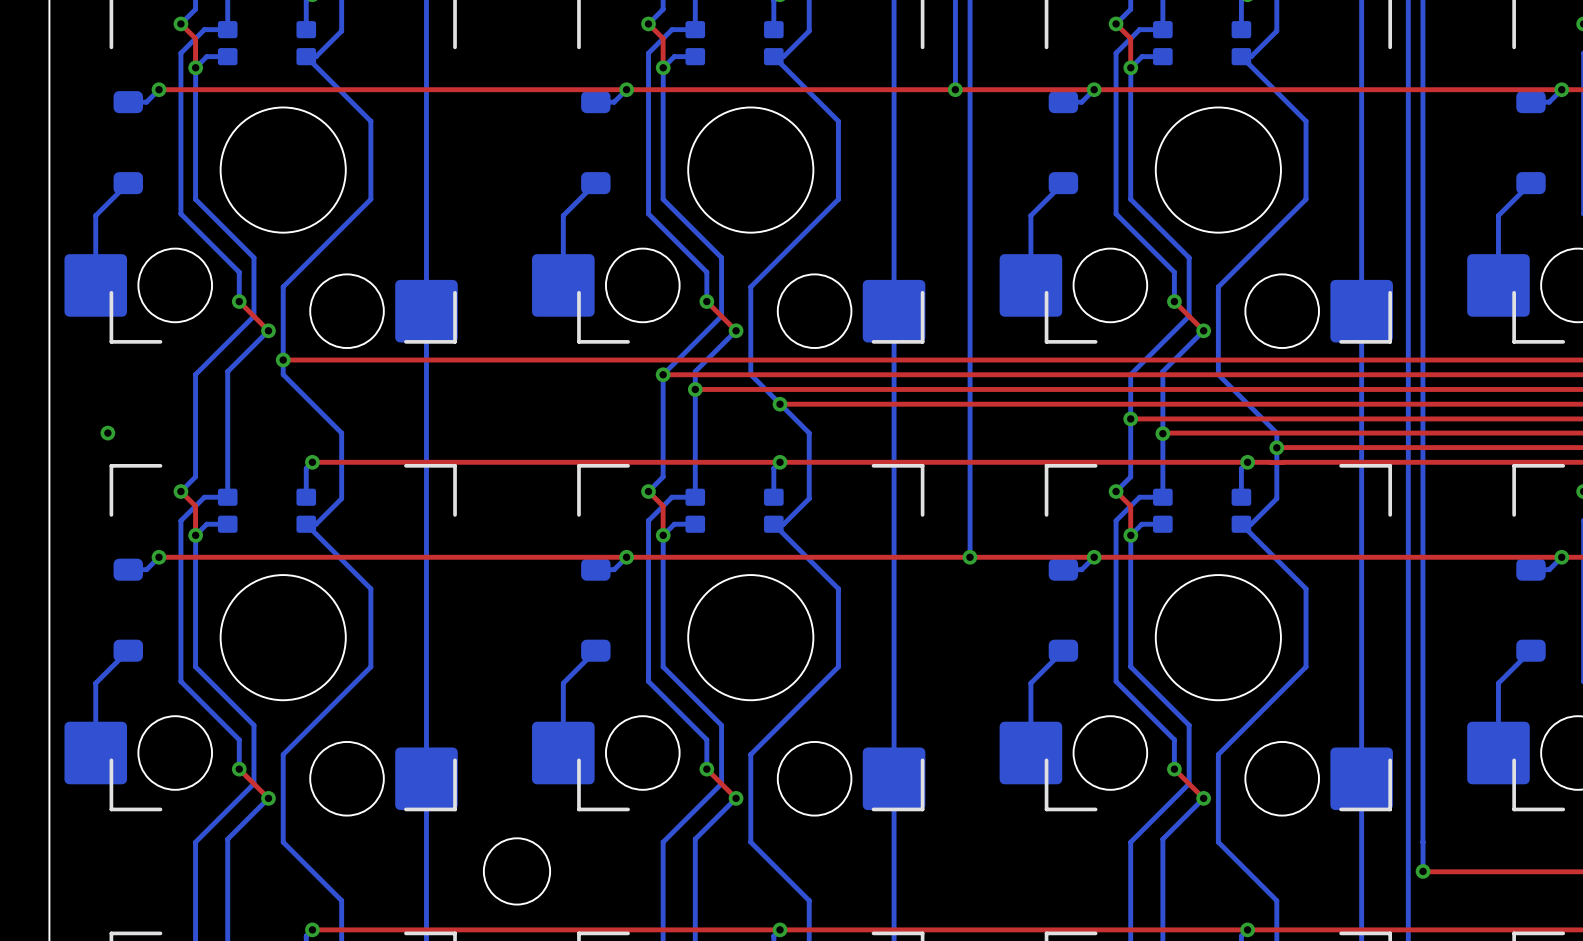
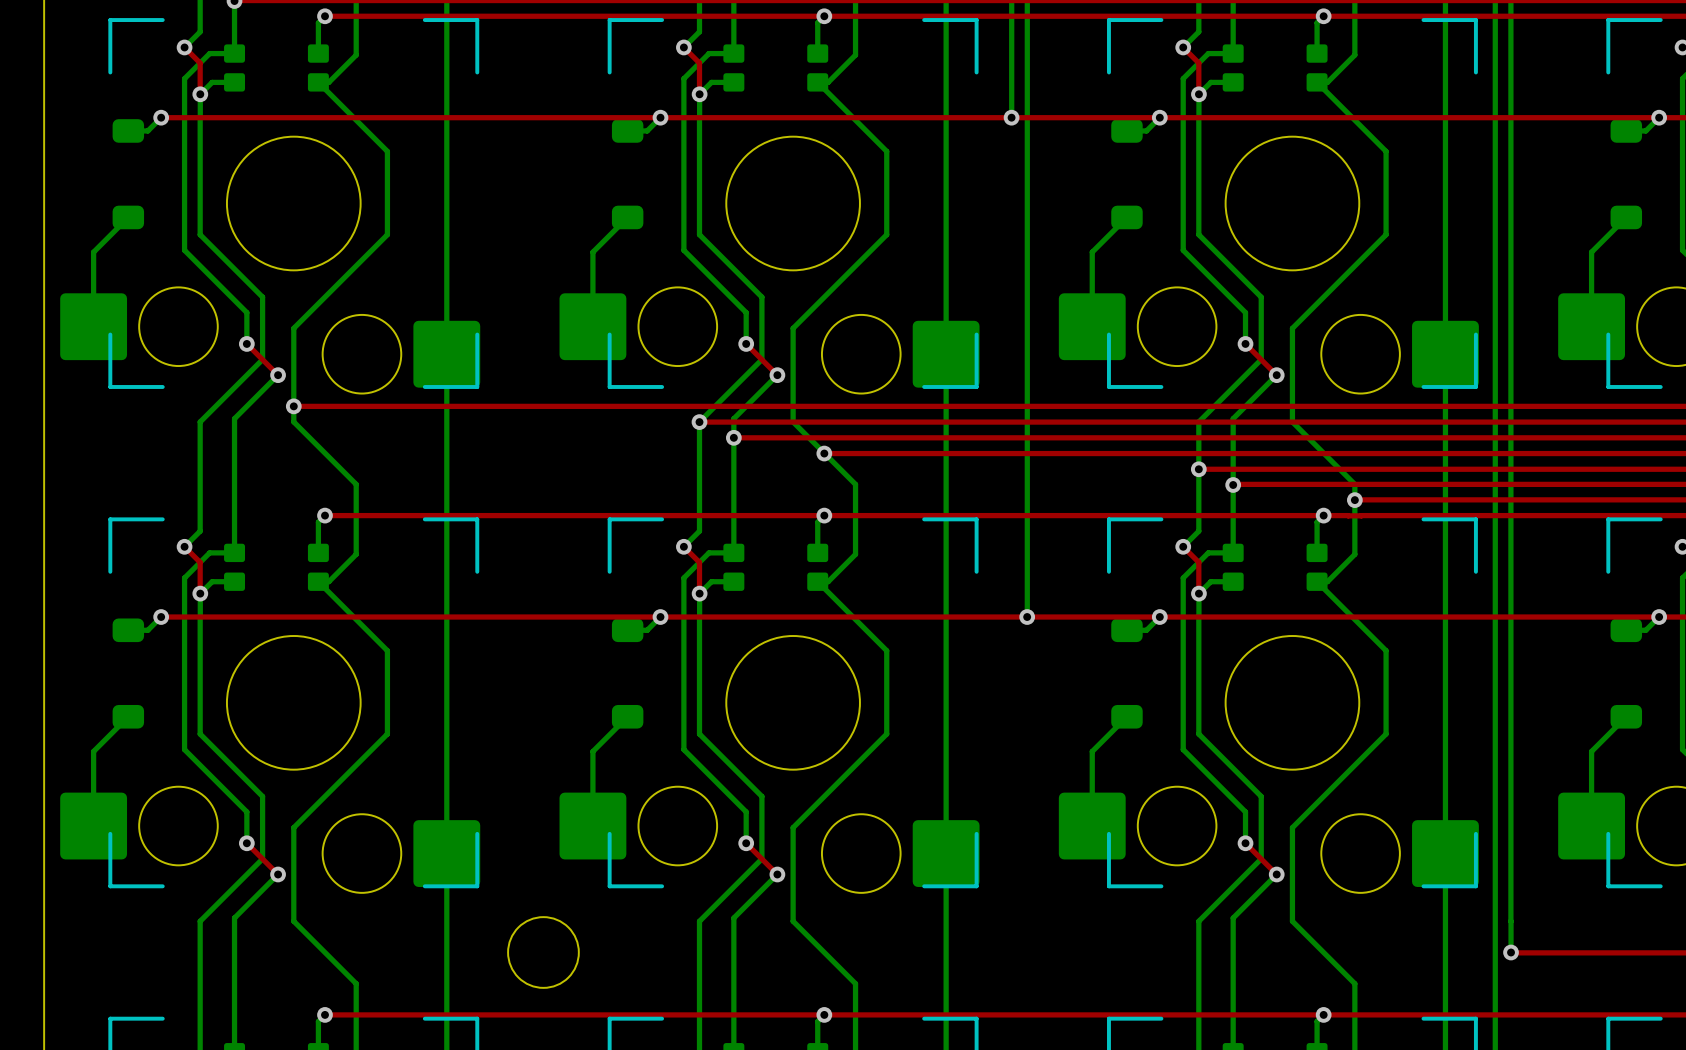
via: (107, 433) -> none

